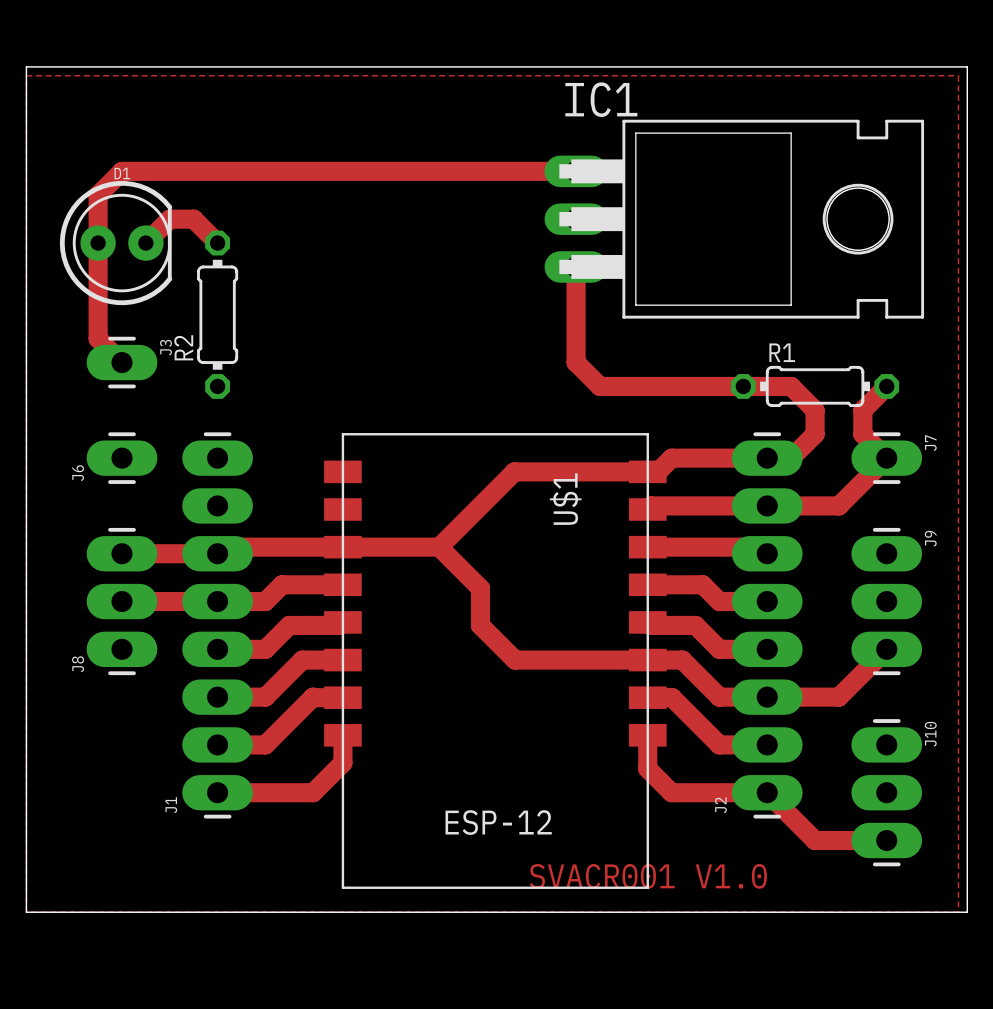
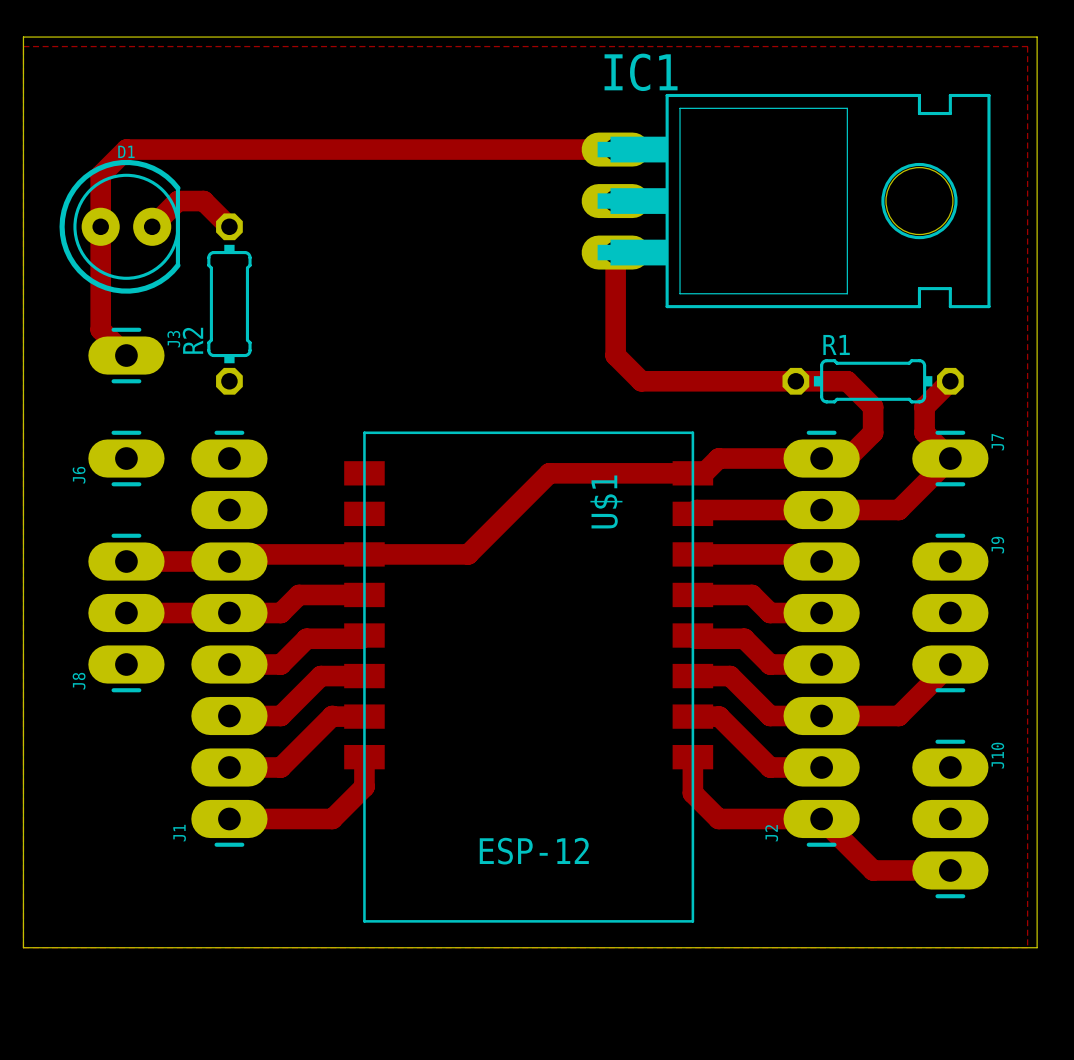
top track: (439, 547) (480, 588) (480, 625) (515, 660) (647, 660) -> none
text: SVACR001 V1.0 (648, 876) -> none

